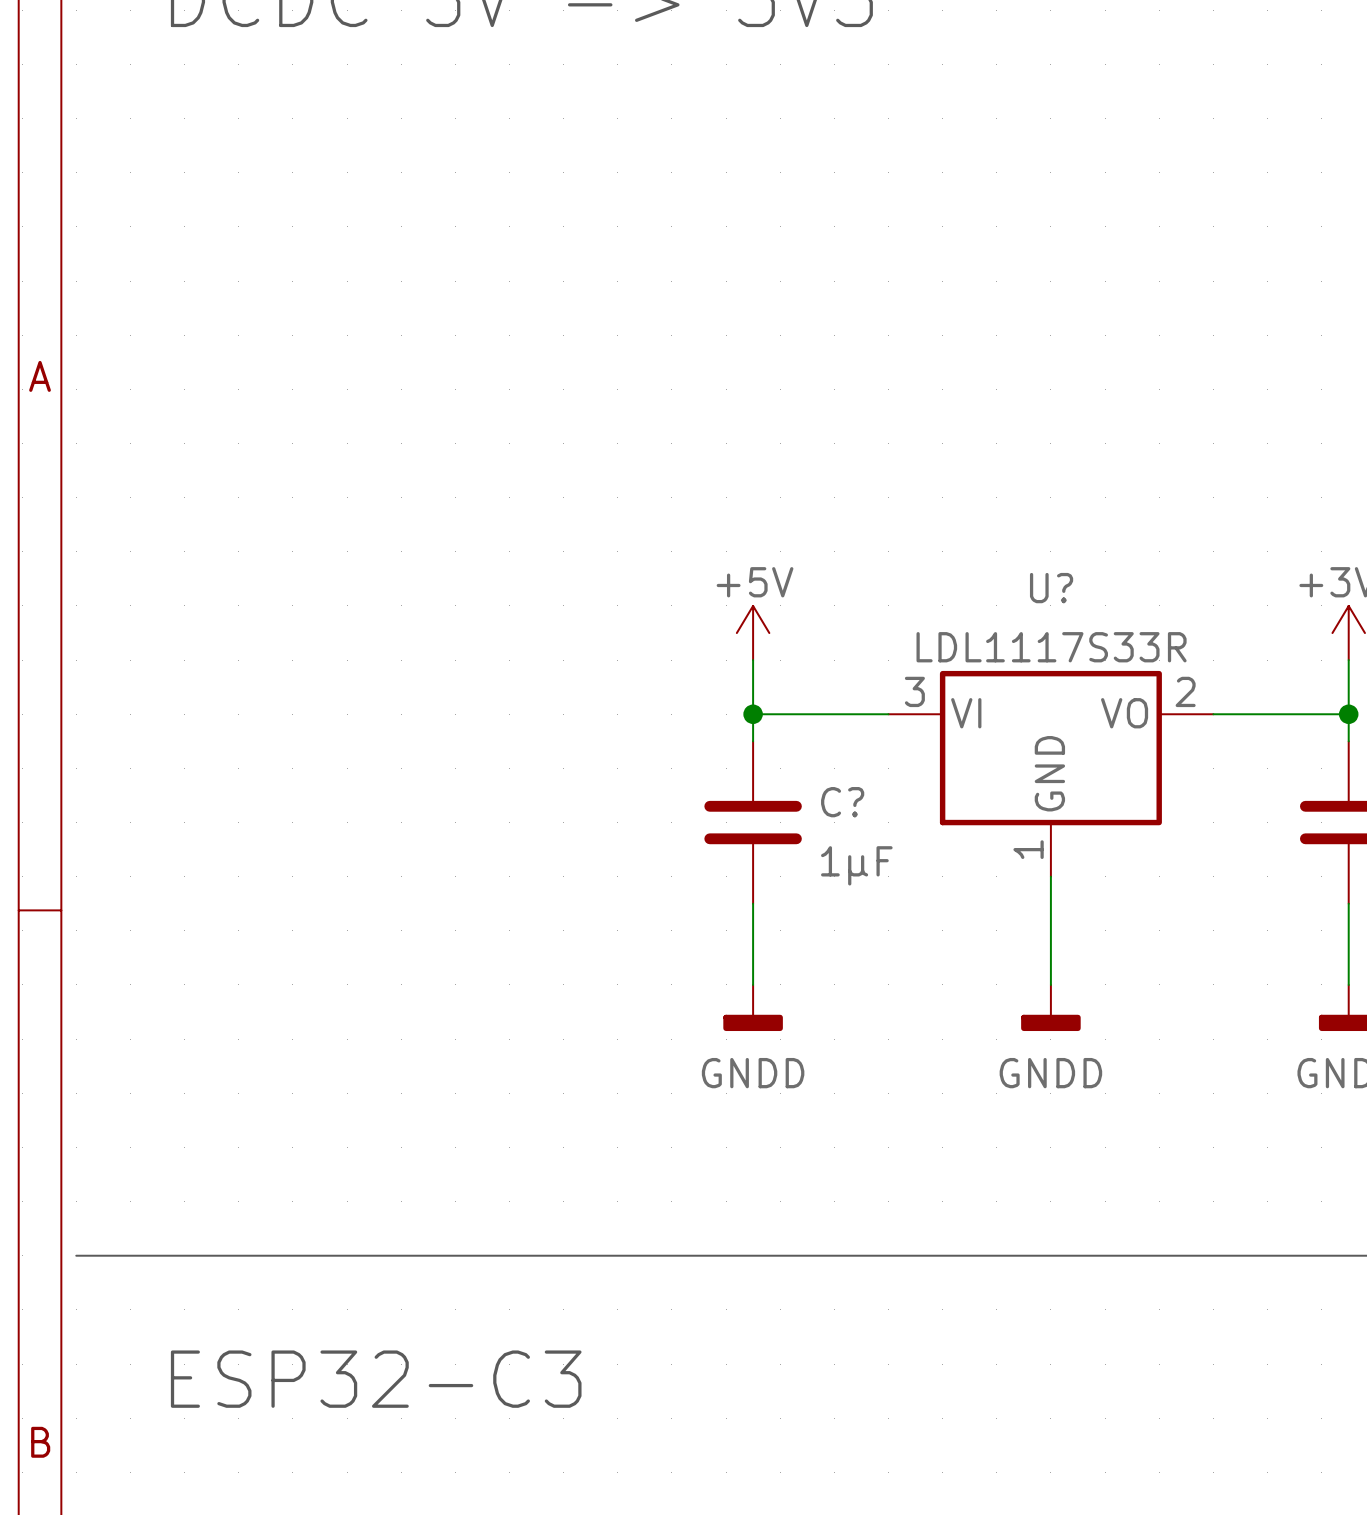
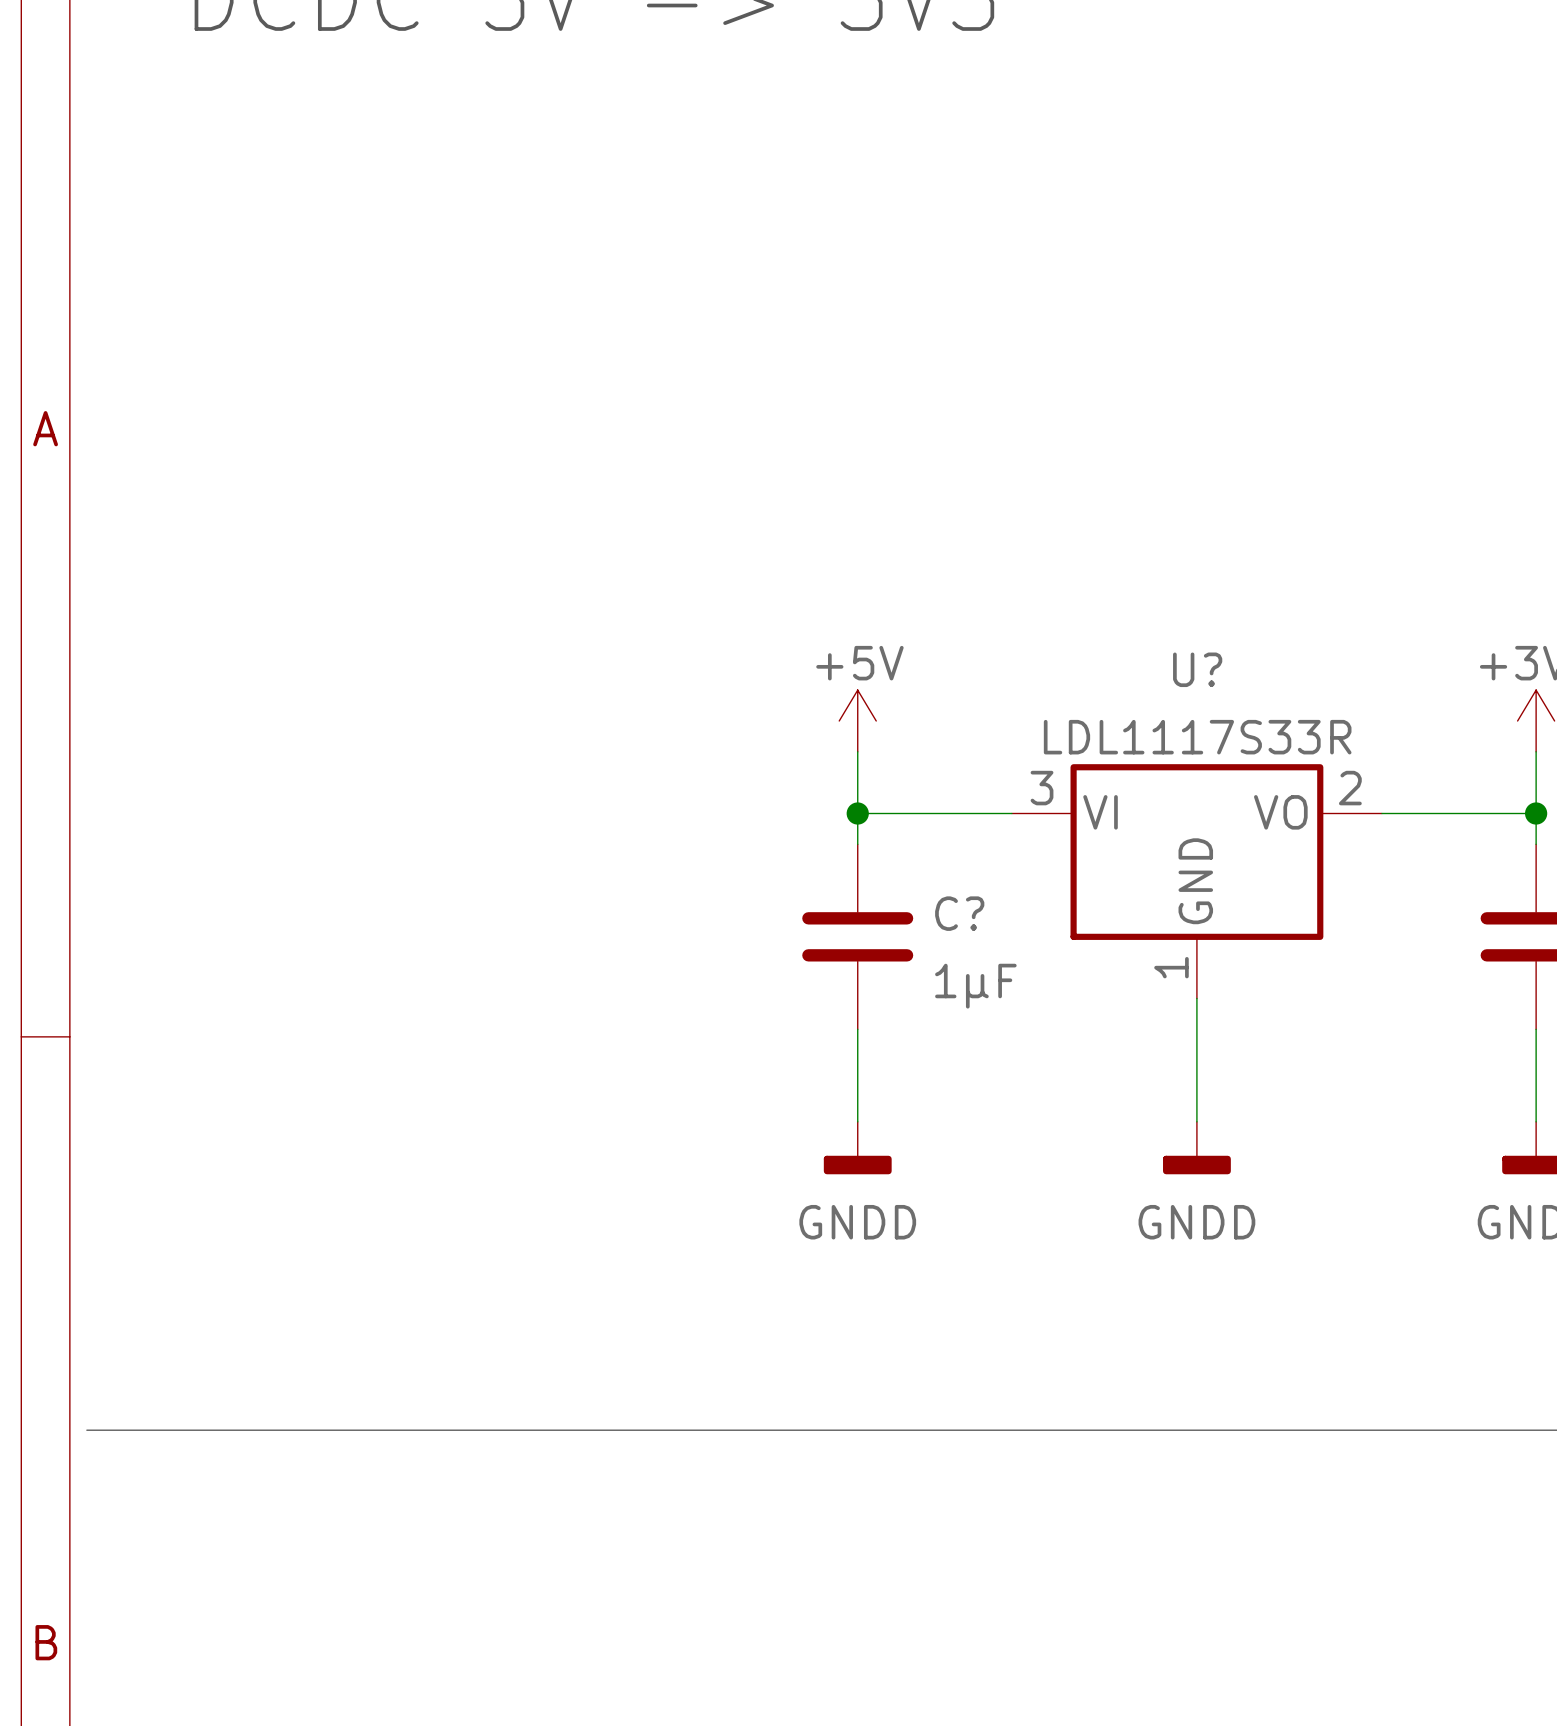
text: ESP32-C3 (376, 1379) -> none

